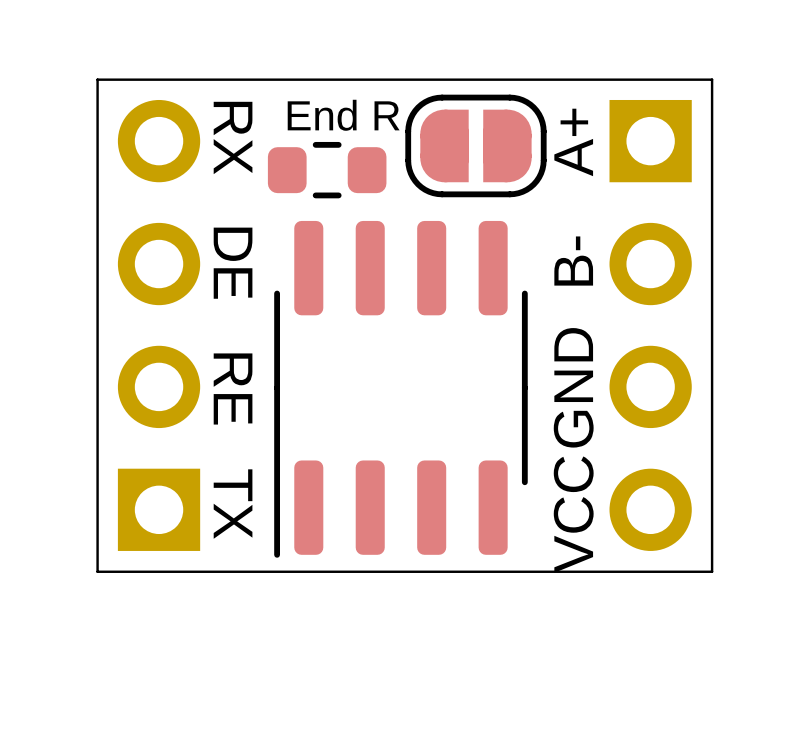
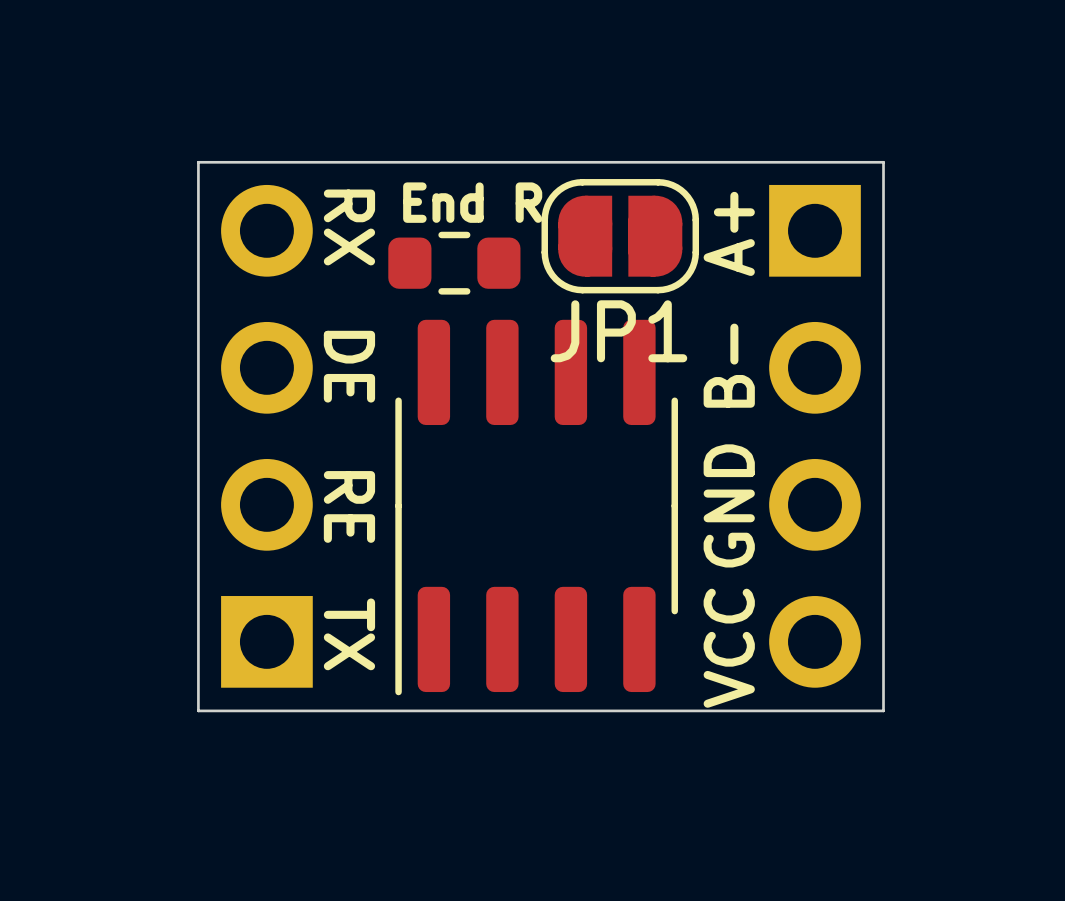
JP1 name: none -> JP1 (618, 331)

